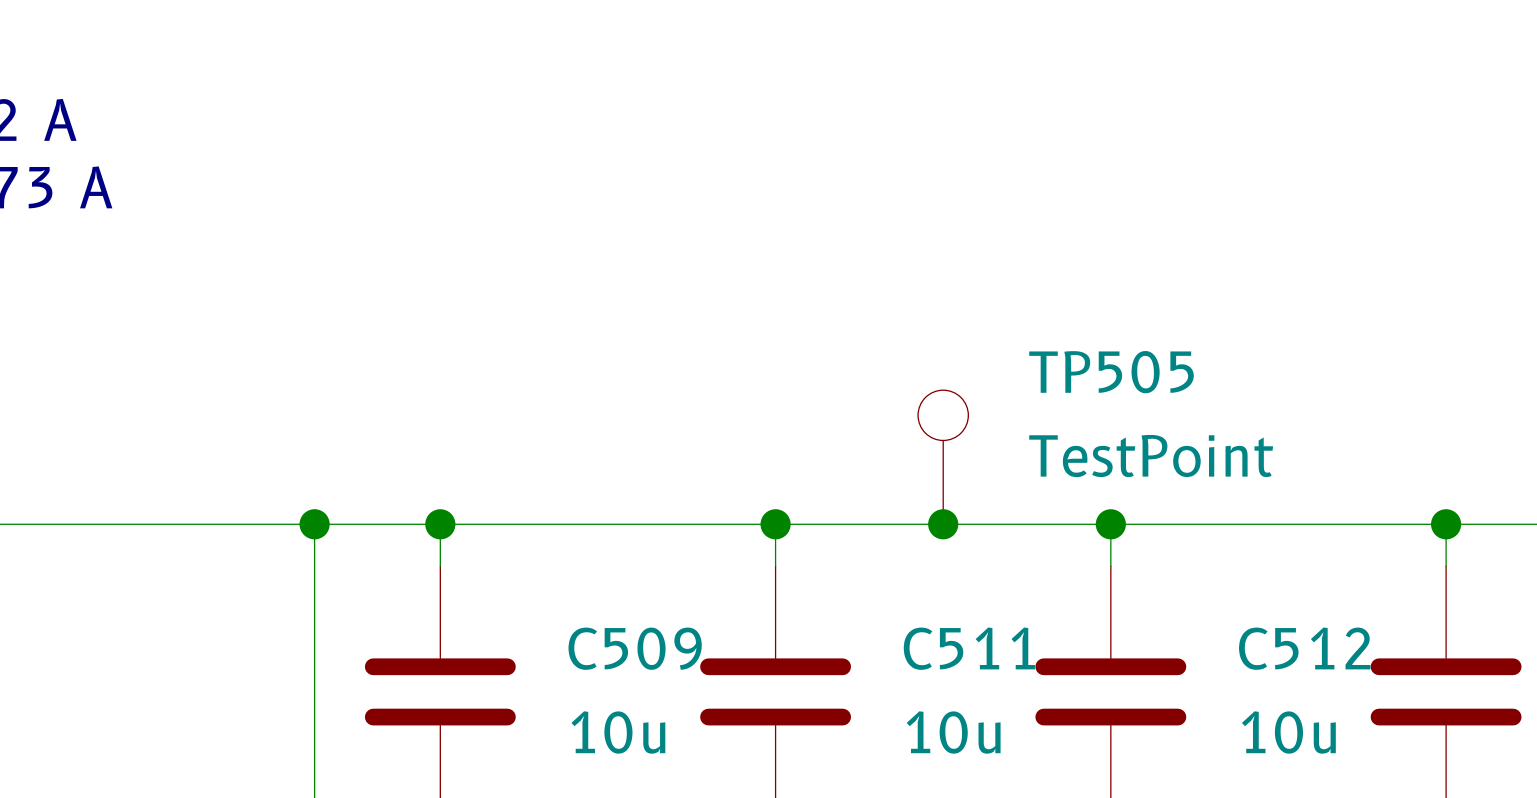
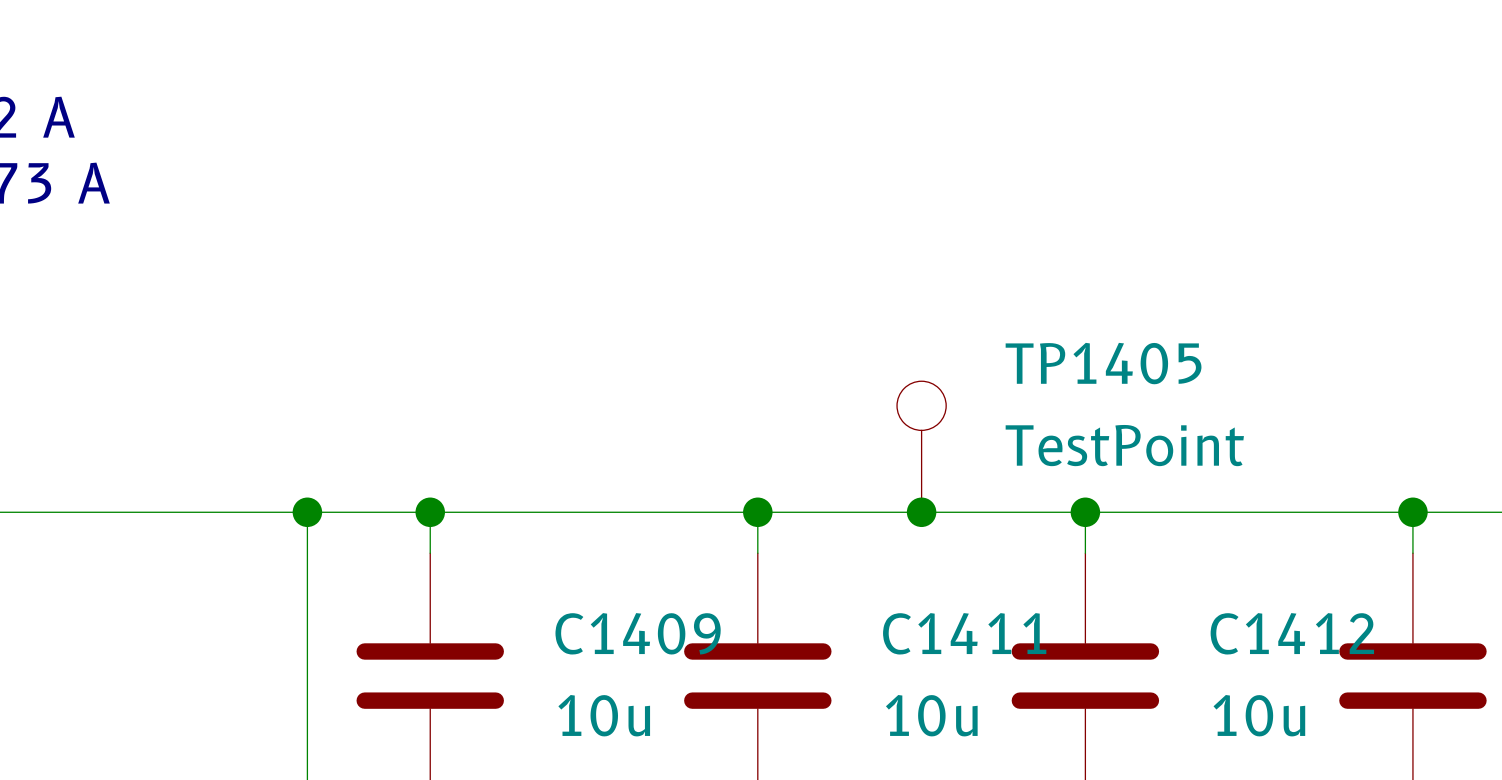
TP505 name: TP505 (1111, 372) -> TP1405 (1103, 363)
C509 name: C509 (635, 648) -> C1409 (638, 633)
C511 name: C511 (969, 648) -> C1411 (964, 633)
C512 name: C512 (1304, 648) -> C1412 (1292, 633)

